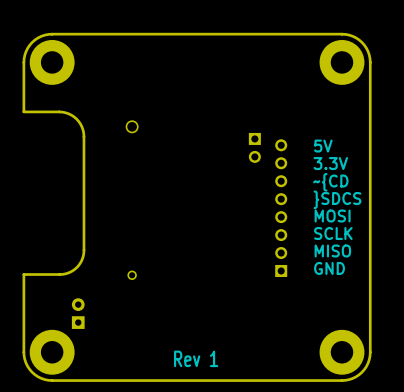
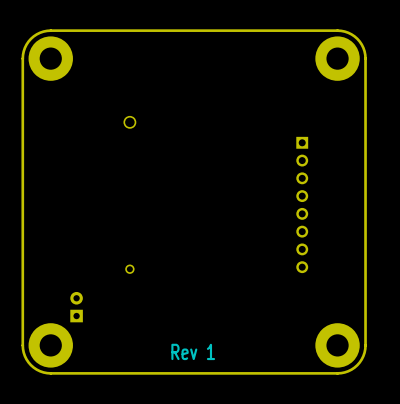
board edge: (23, 111) (65, 112) (74, 117) (82, 127) (83, 136) (83, 249) (80, 263) (70, 272) (62, 274) (23, 274) -> (22, 107) (22, 268)
text: 5V (323, 146) -> none
part: (254, 147) -> none
text: 3.3V (330, 163) -> none
text: ~{CD (330, 182) -> none
text: }SDCS (337, 199) -> none
part rotation: 0° (281, 208) -> 180° (302, 204)
text: MOSI (332, 216) -> none
text: SCLK (333, 233) -> none
text: MISO (332, 250) -> none
text: GND (329, 268) -> none

